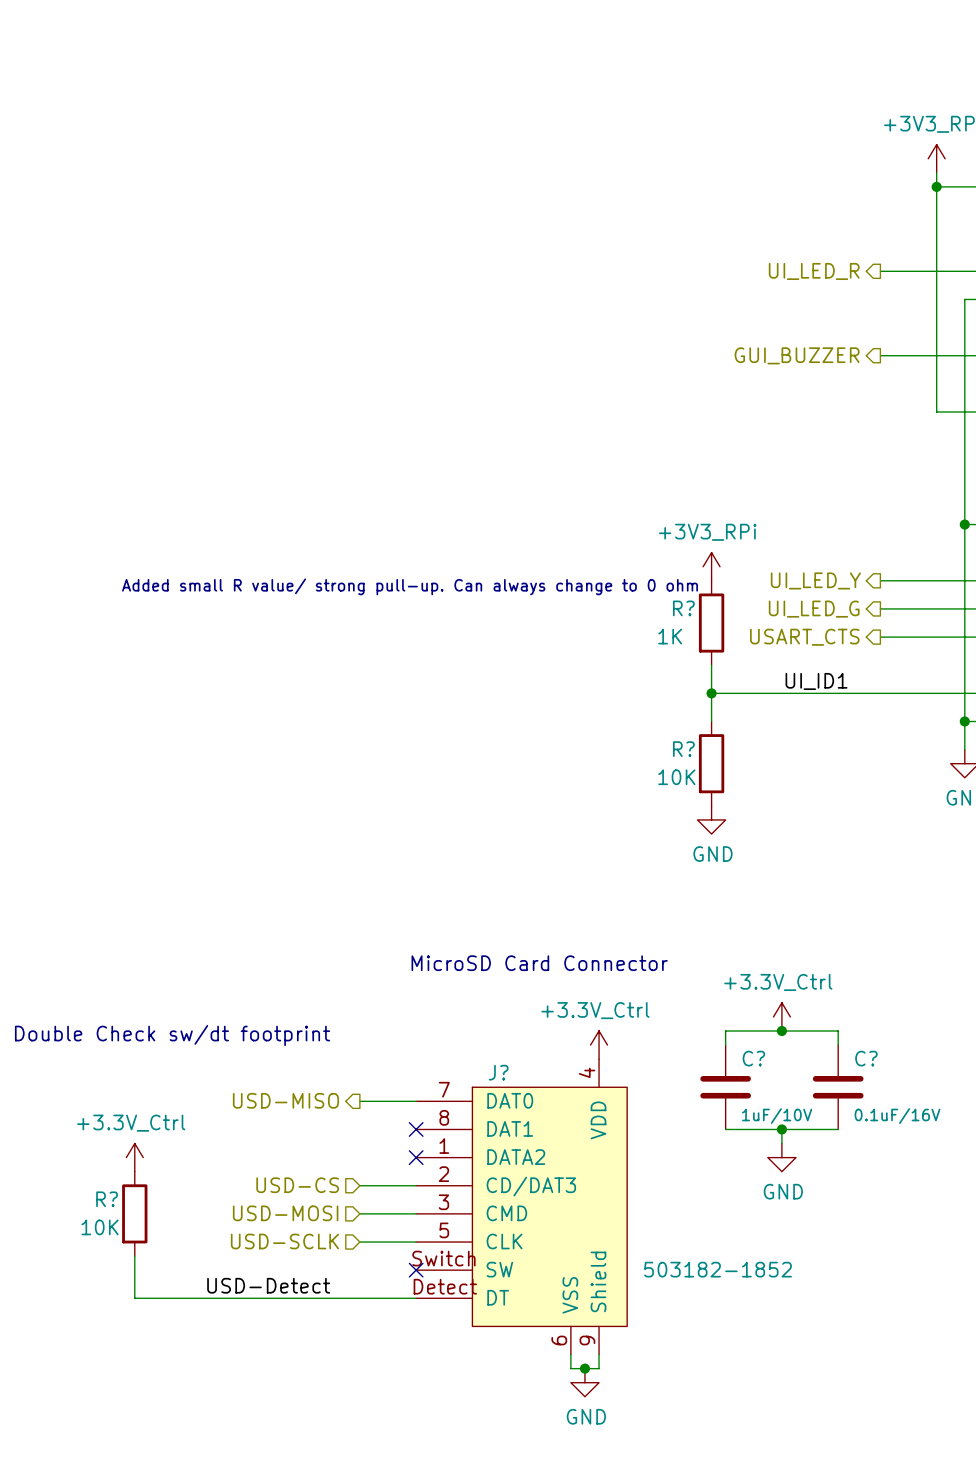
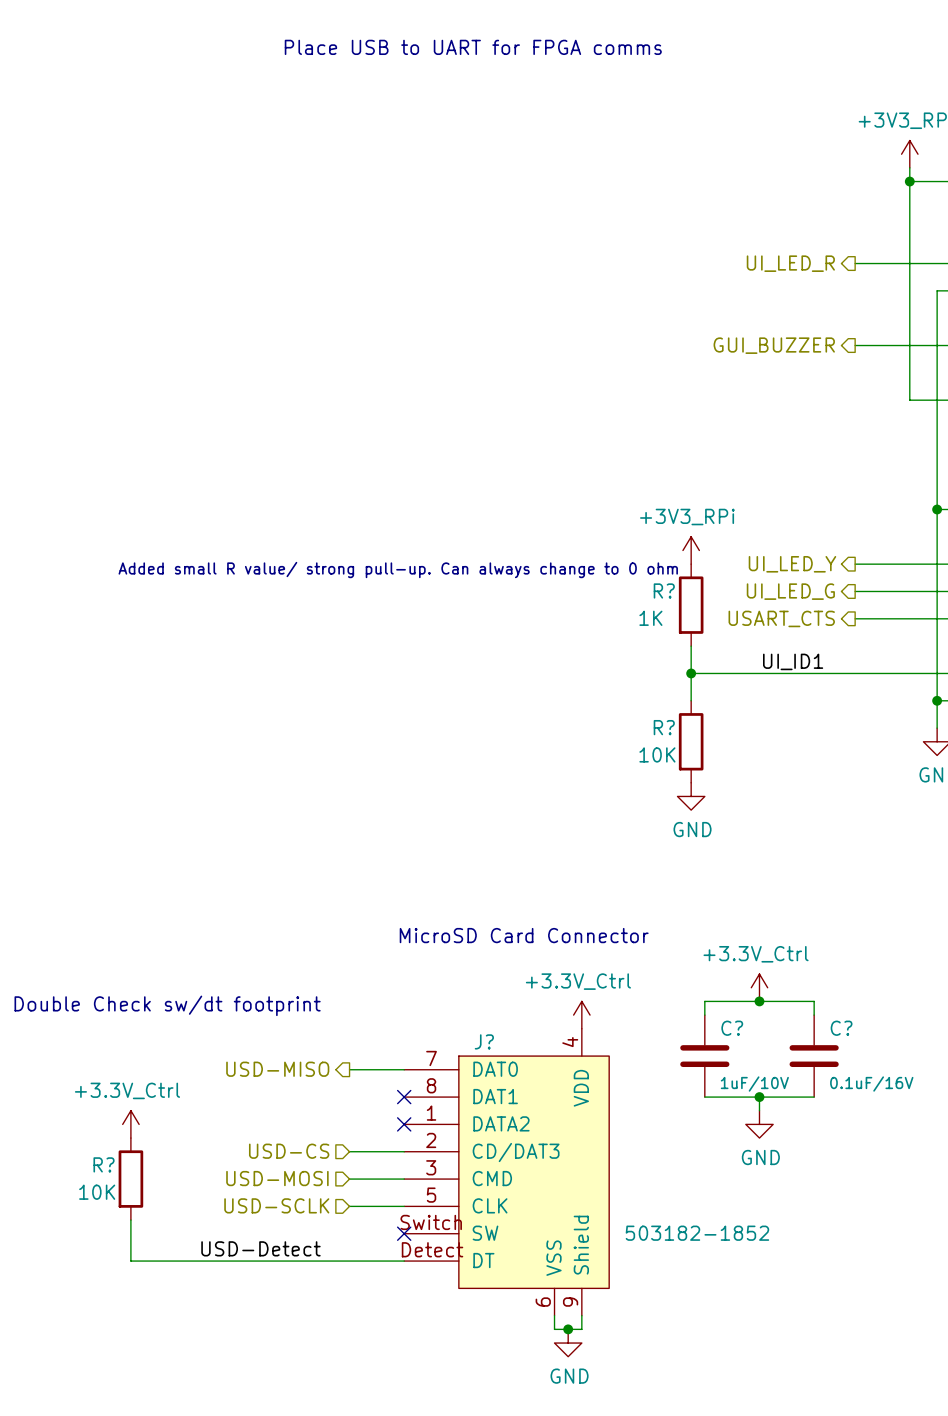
text: none -> Place USB to UART for FPGA comms (473, 47)

